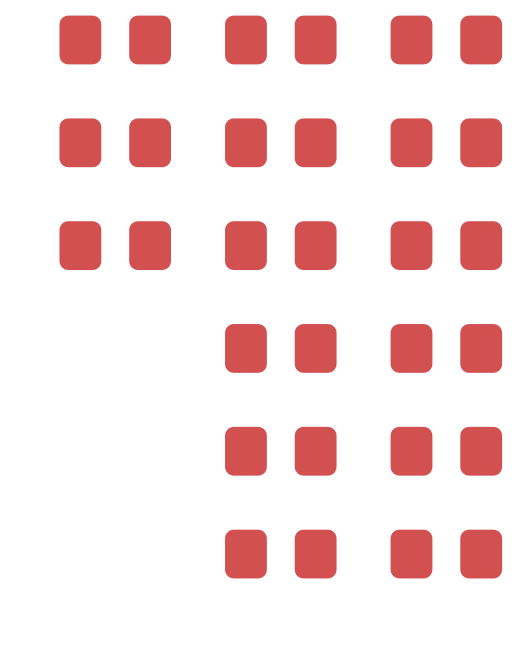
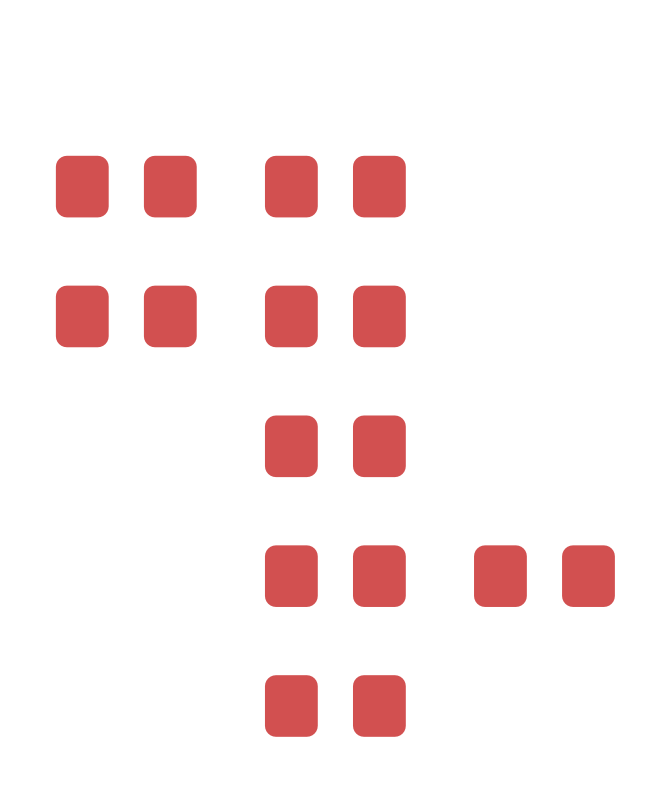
part: (115, 39) -> none
part: (280, 39) -> none
part: (446, 39) -> none
part: (446, 142) -> none
part: (446, 245) -> none
part: (446, 348) -> none
part: (446, 554) -> none

